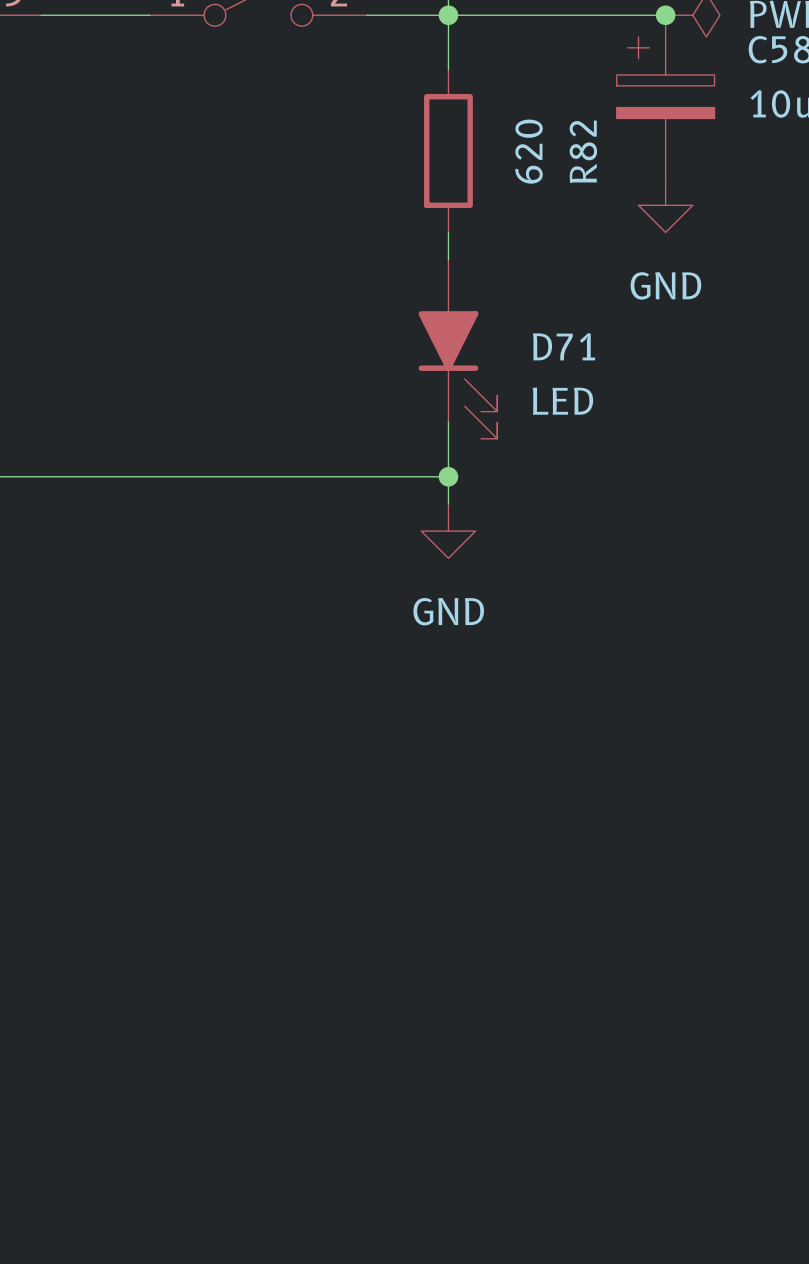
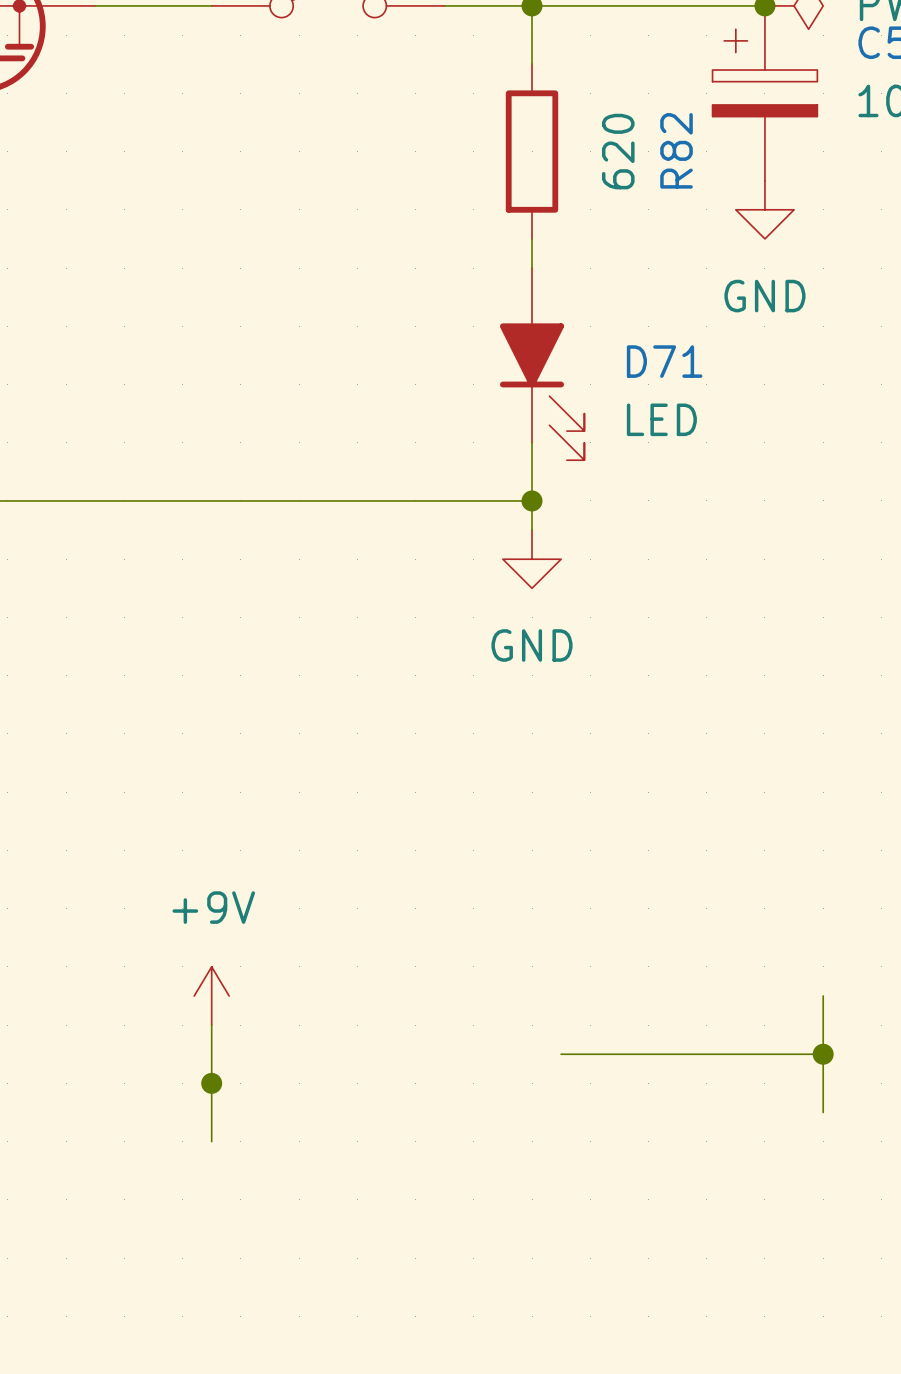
power symbol: none -> +9V (211, 996)
wire: none -> (823, 996) (823, 1112)
wire: none -> (211, 1025) (211, 1141)
wire: none -> (561, 1054) (823, 1054)
junction: none -> (823, 1054)
junction: none -> (211, 1083)

